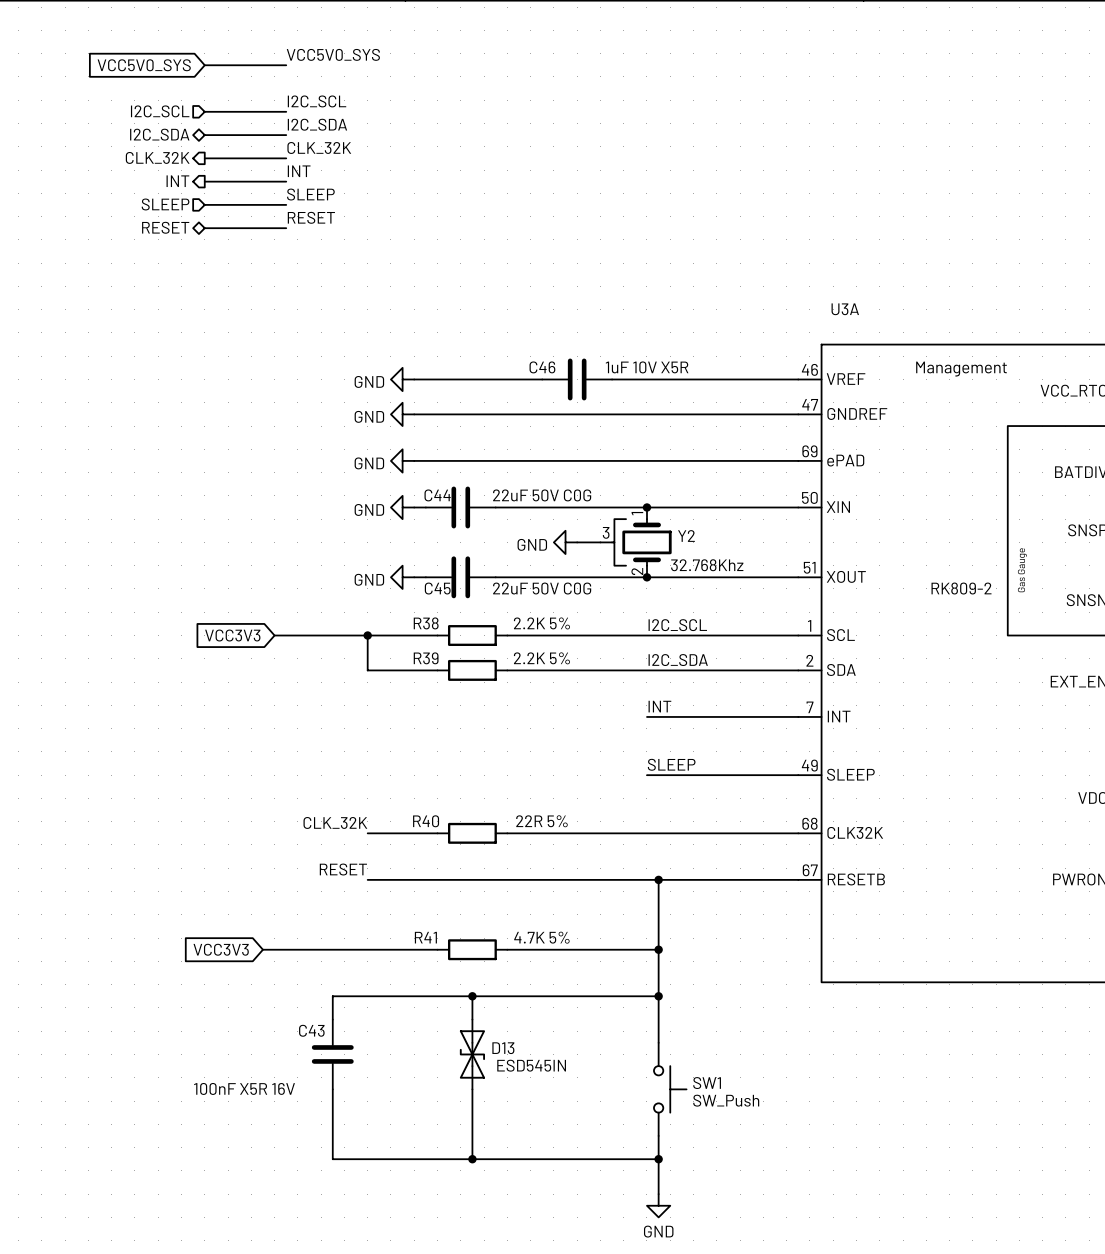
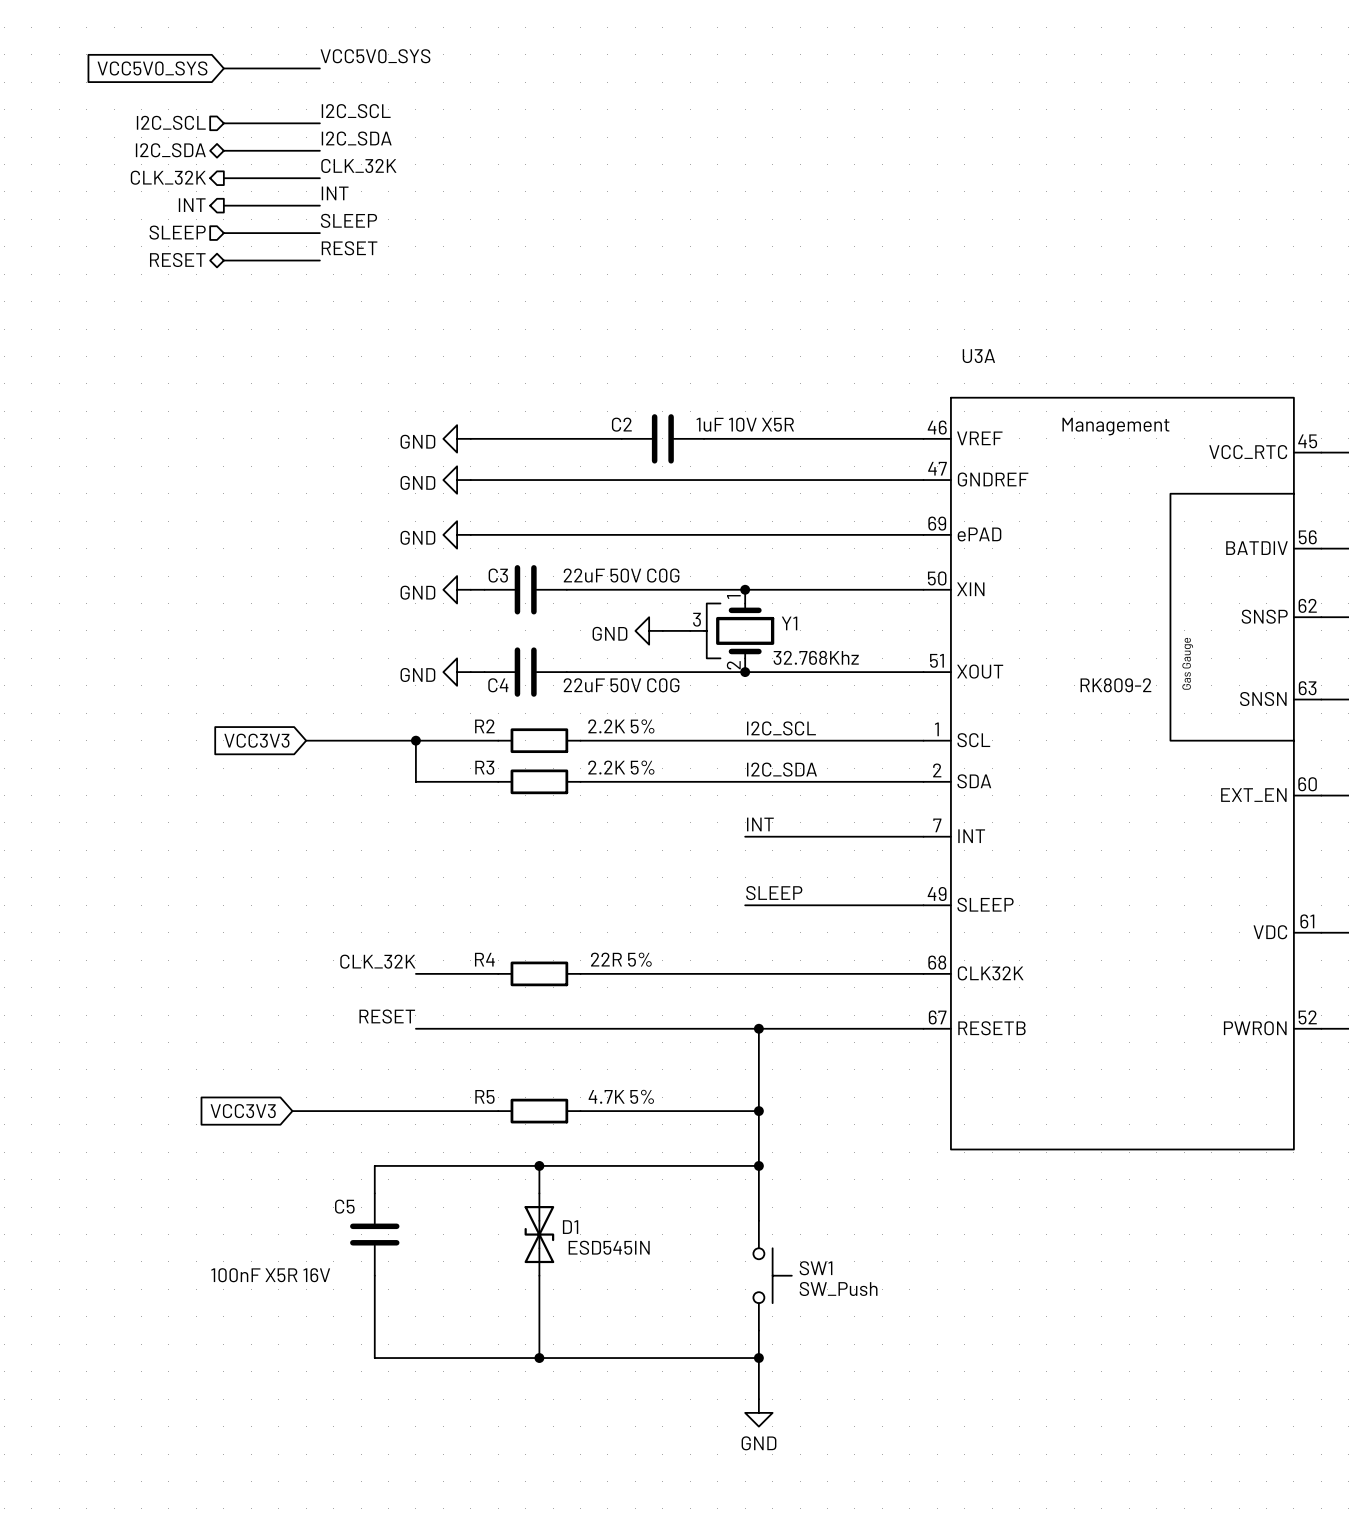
C46 name: C46 (542, 367) -> C2 (621, 424)
C44 name: C44 (437, 495) -> C3 (498, 575)
Y2 name: Y2 (686, 536) -> Y1 (789, 623)
C45 name: C45 (437, 588) -> C4 (498, 685)
R38 name: R38 (426, 623) -> R2 (484, 726)
R39 name: R39 (426, 658) -> R3 (484, 767)
R40 name: R40 (426, 821) -> R4 (484, 959)
R41 name: R41 (425, 937) -> R5 (484, 1096)
C43 name: C43 (311, 1030) -> C5 (344, 1206)
D13 name: D13 (503, 1048) -> D1 (570, 1227)

